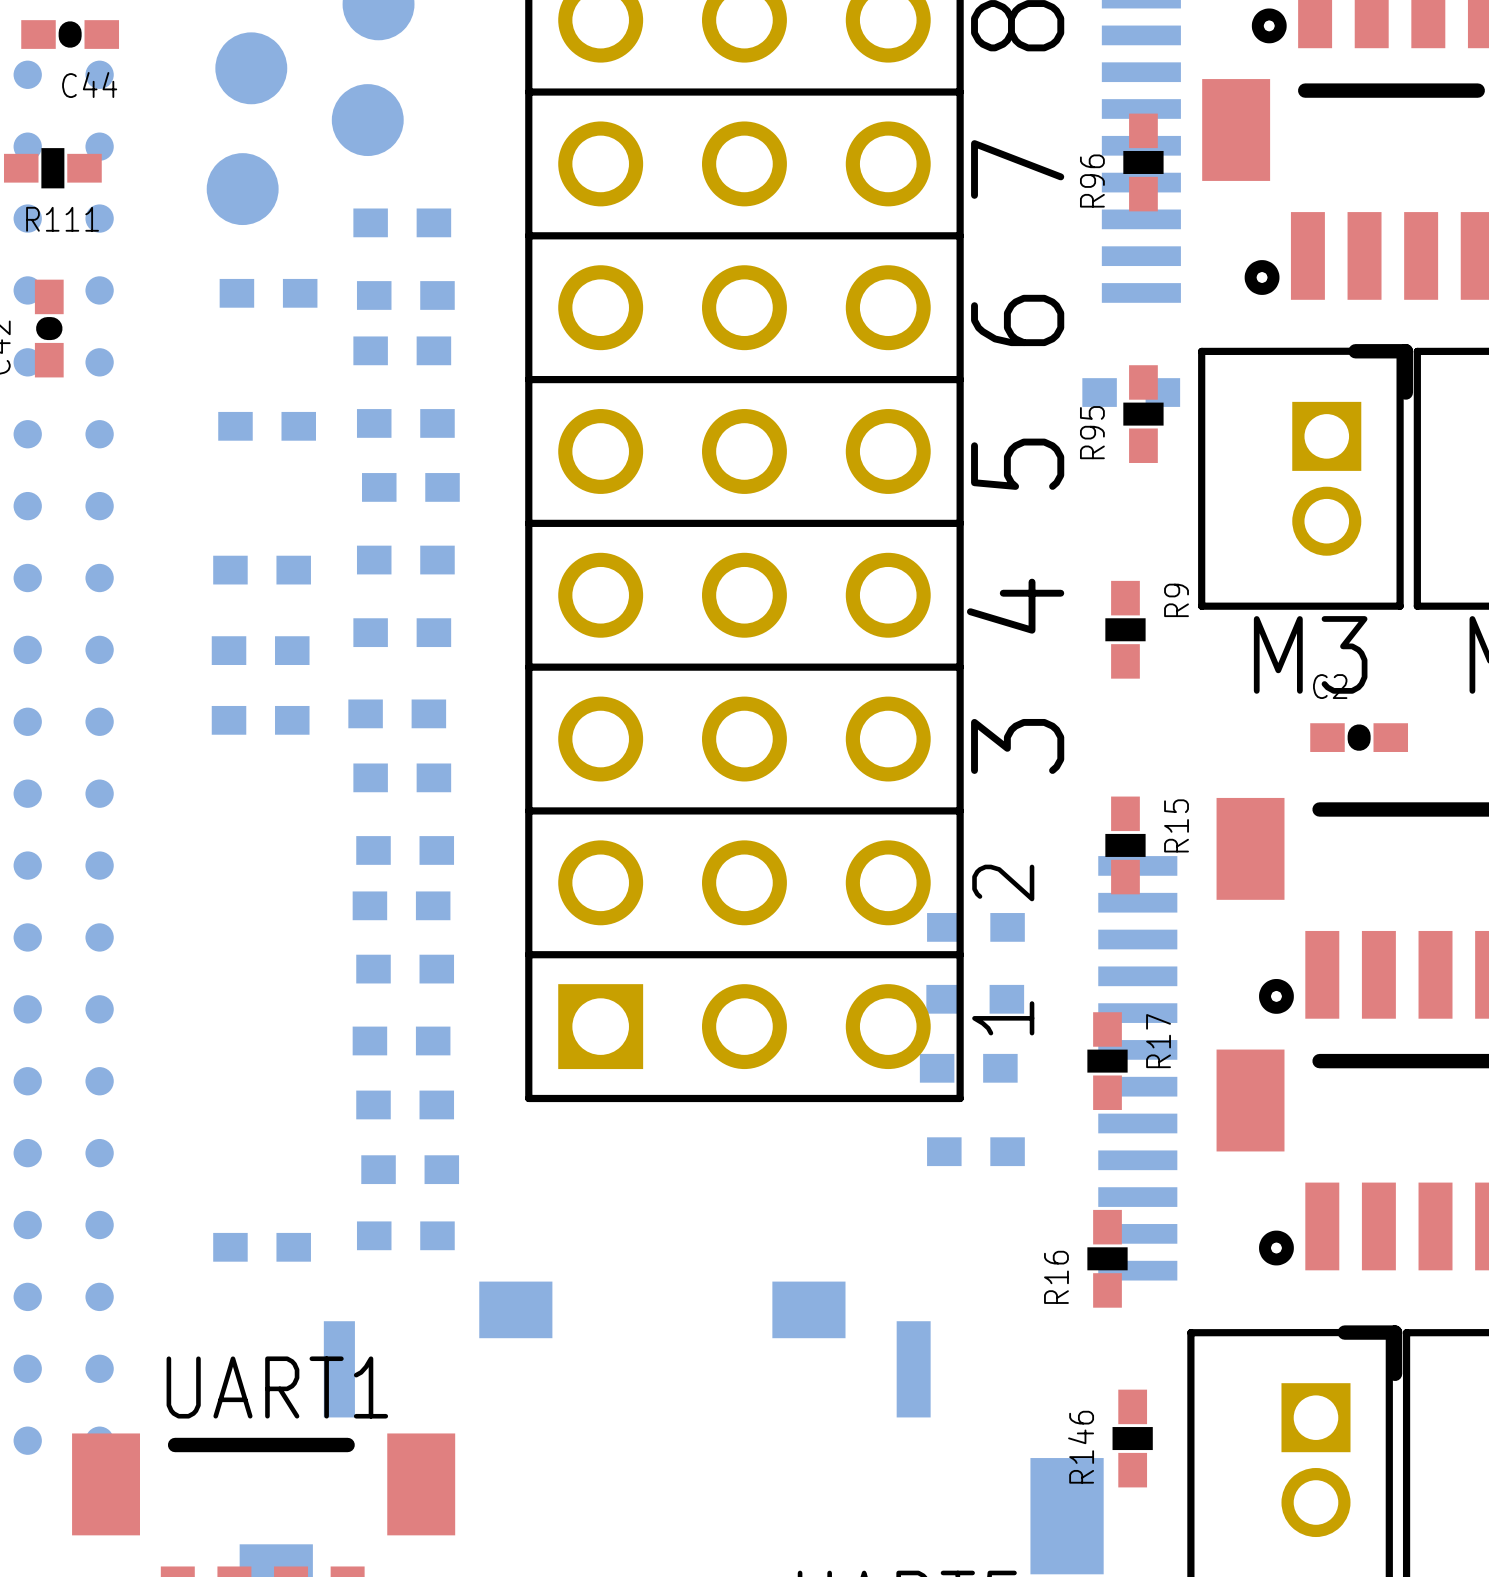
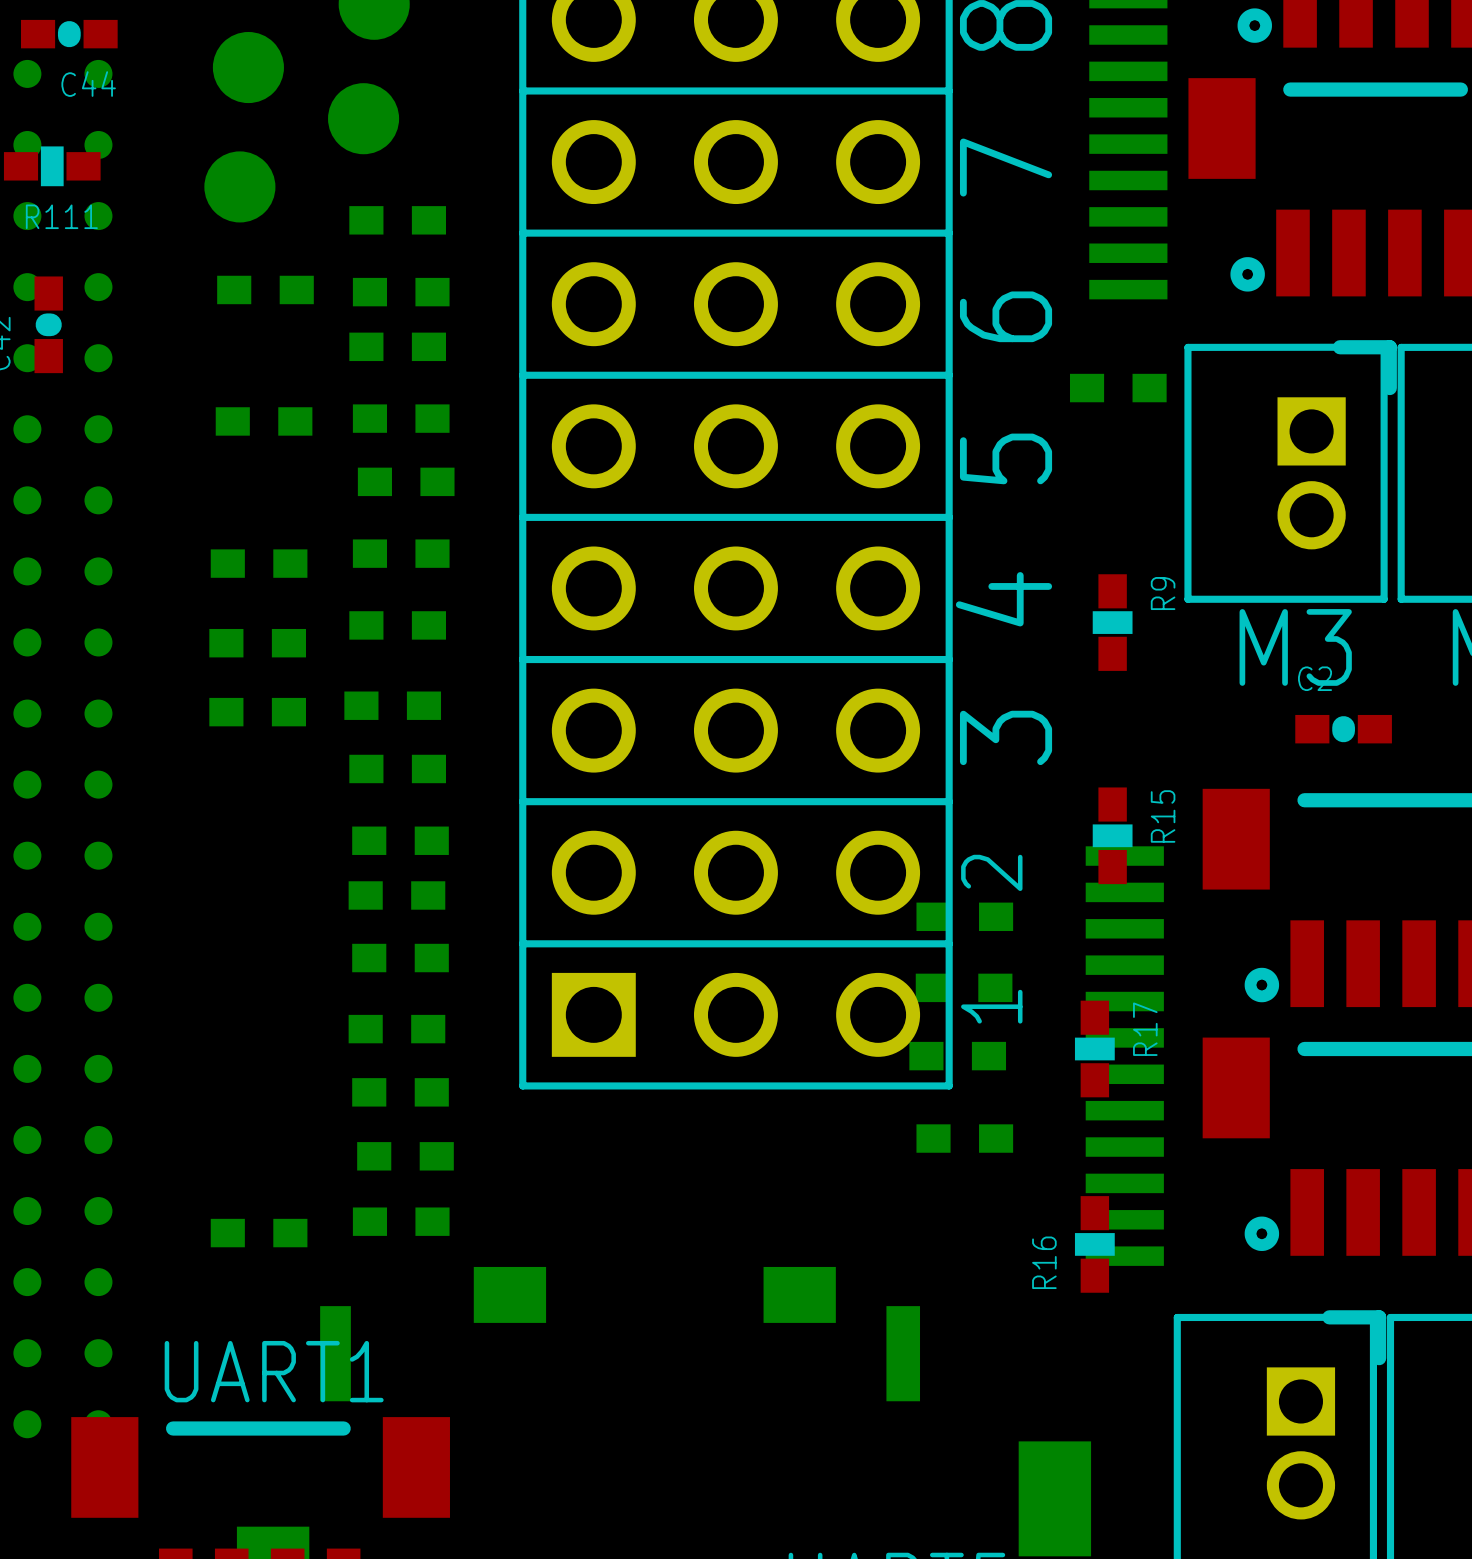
R96: (1143, 162) -> none
R95: (1143, 414) -> none
R146: (1132, 1438) -> none

